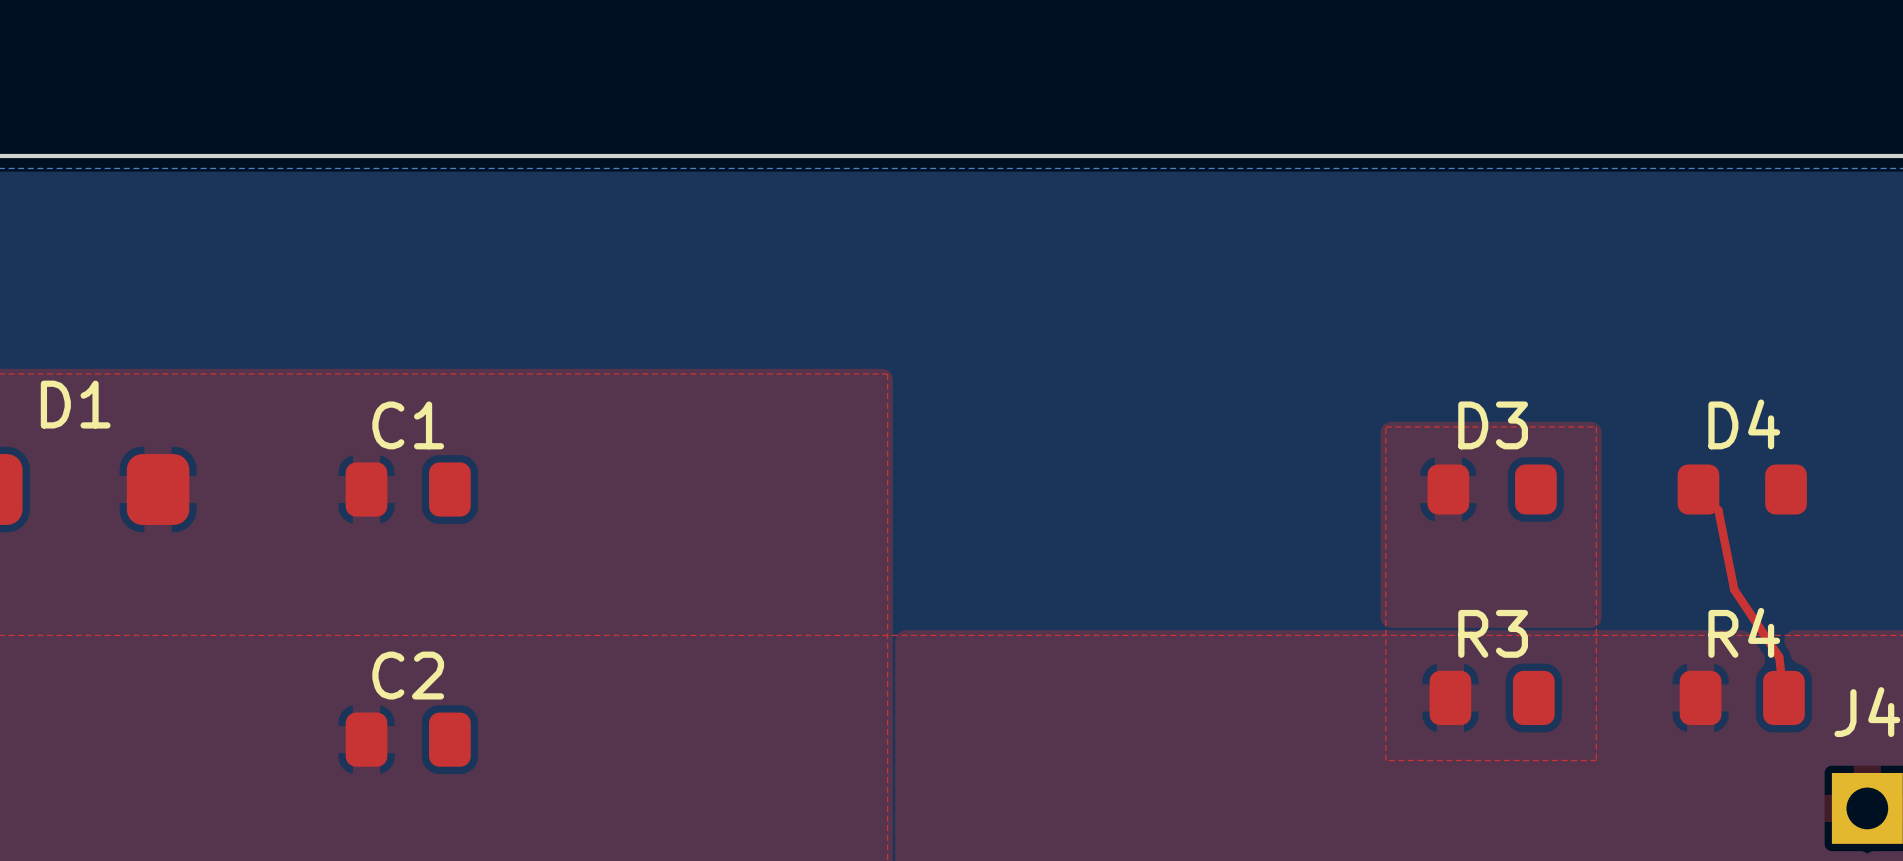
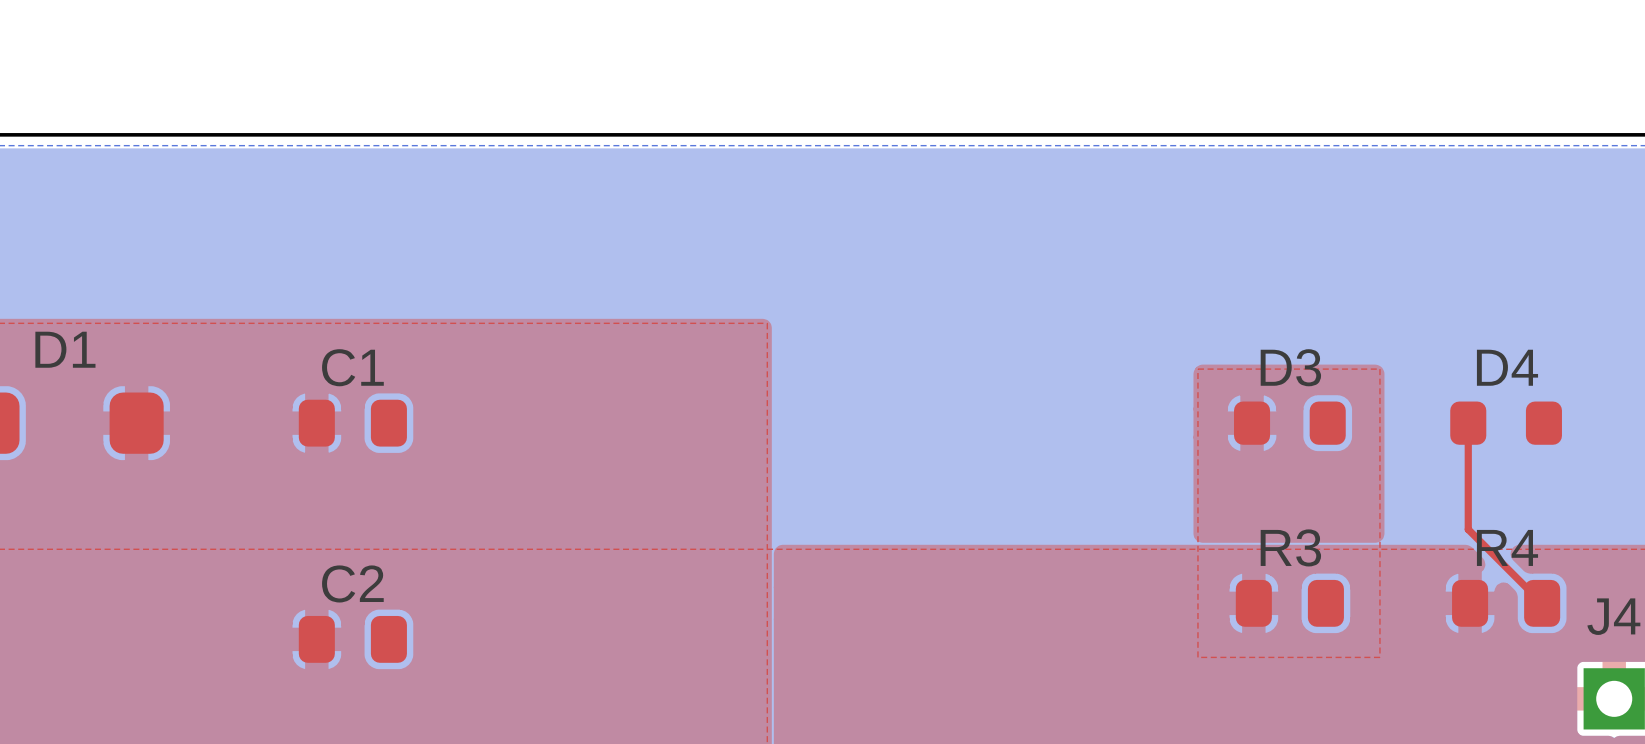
top track: (1698, 489) (1718, 510) (1734, 589) (1779, 657) (1783, 697) -> (1468, 423) (1468, 529) (1542, 603)

